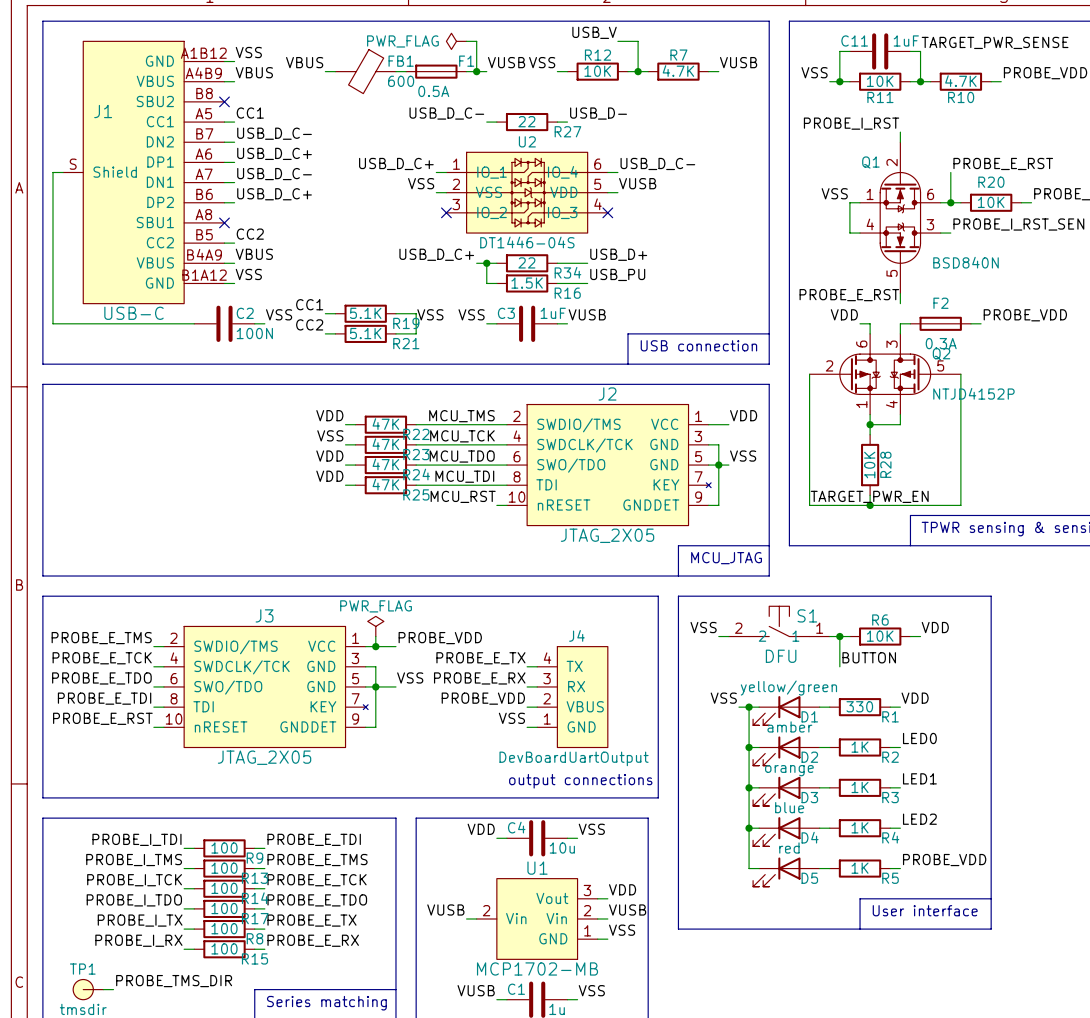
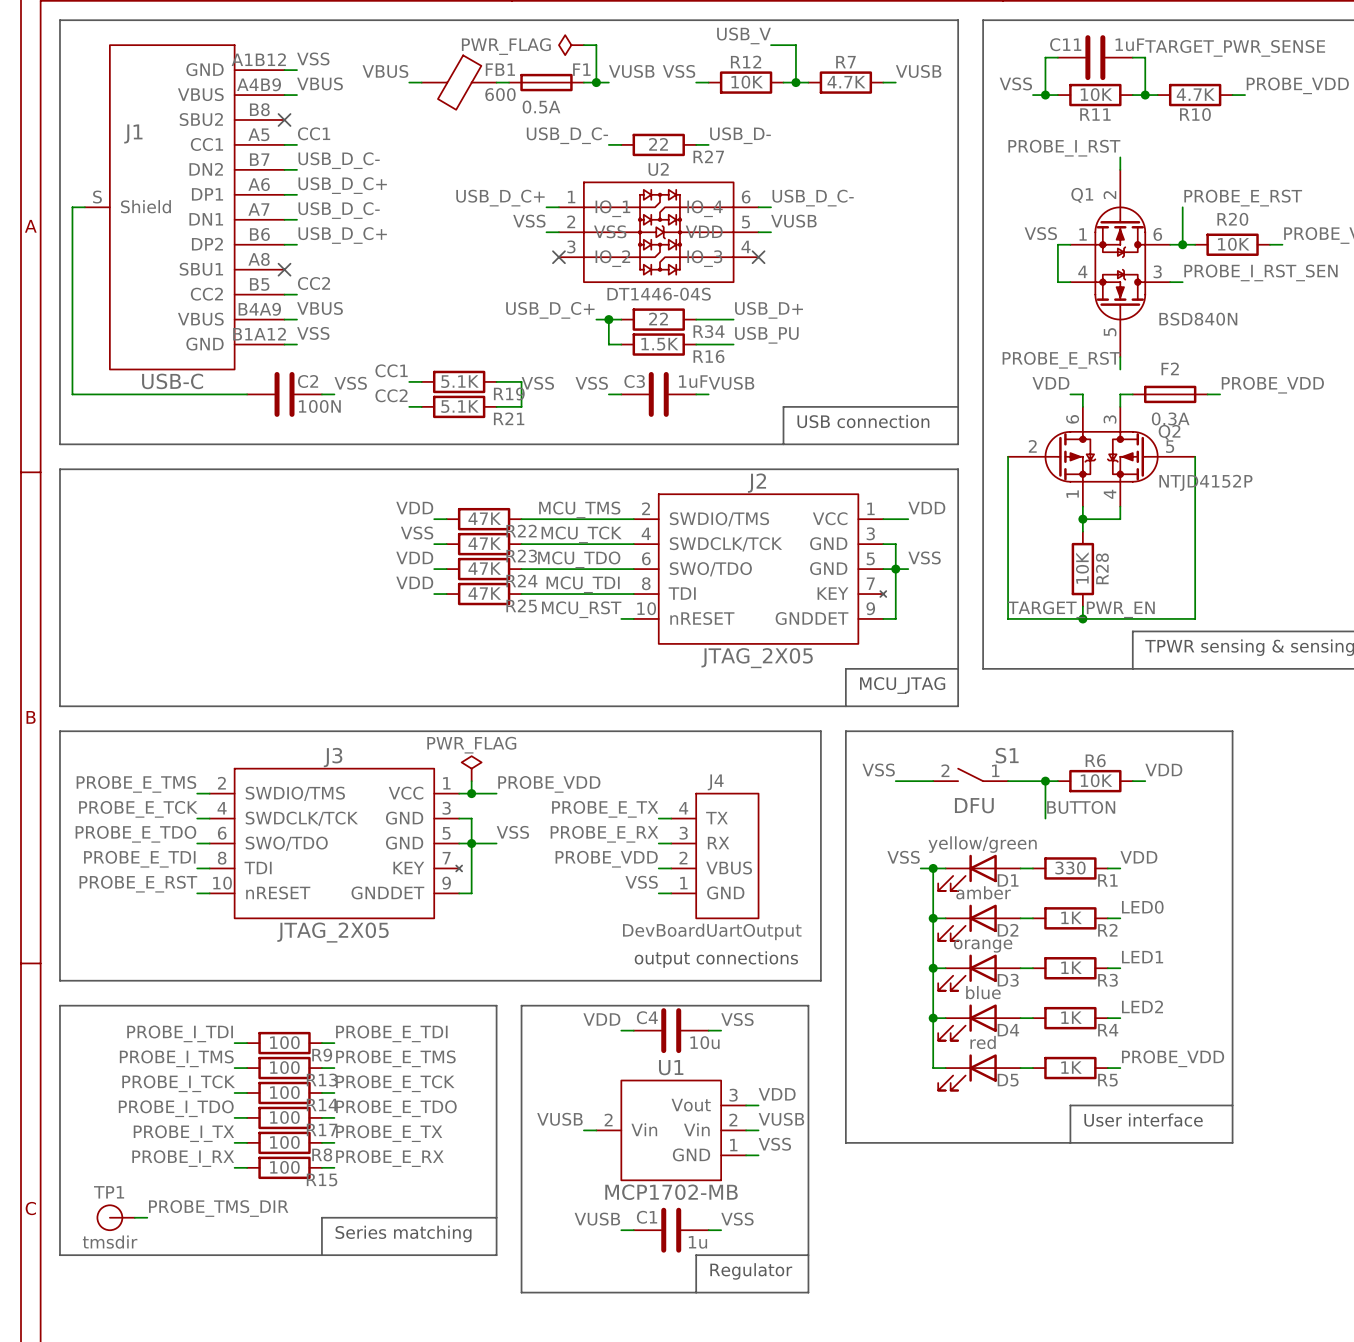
S1 symbol: [728, 606, 830, 637] -> [933, 768, 1009, 782]

